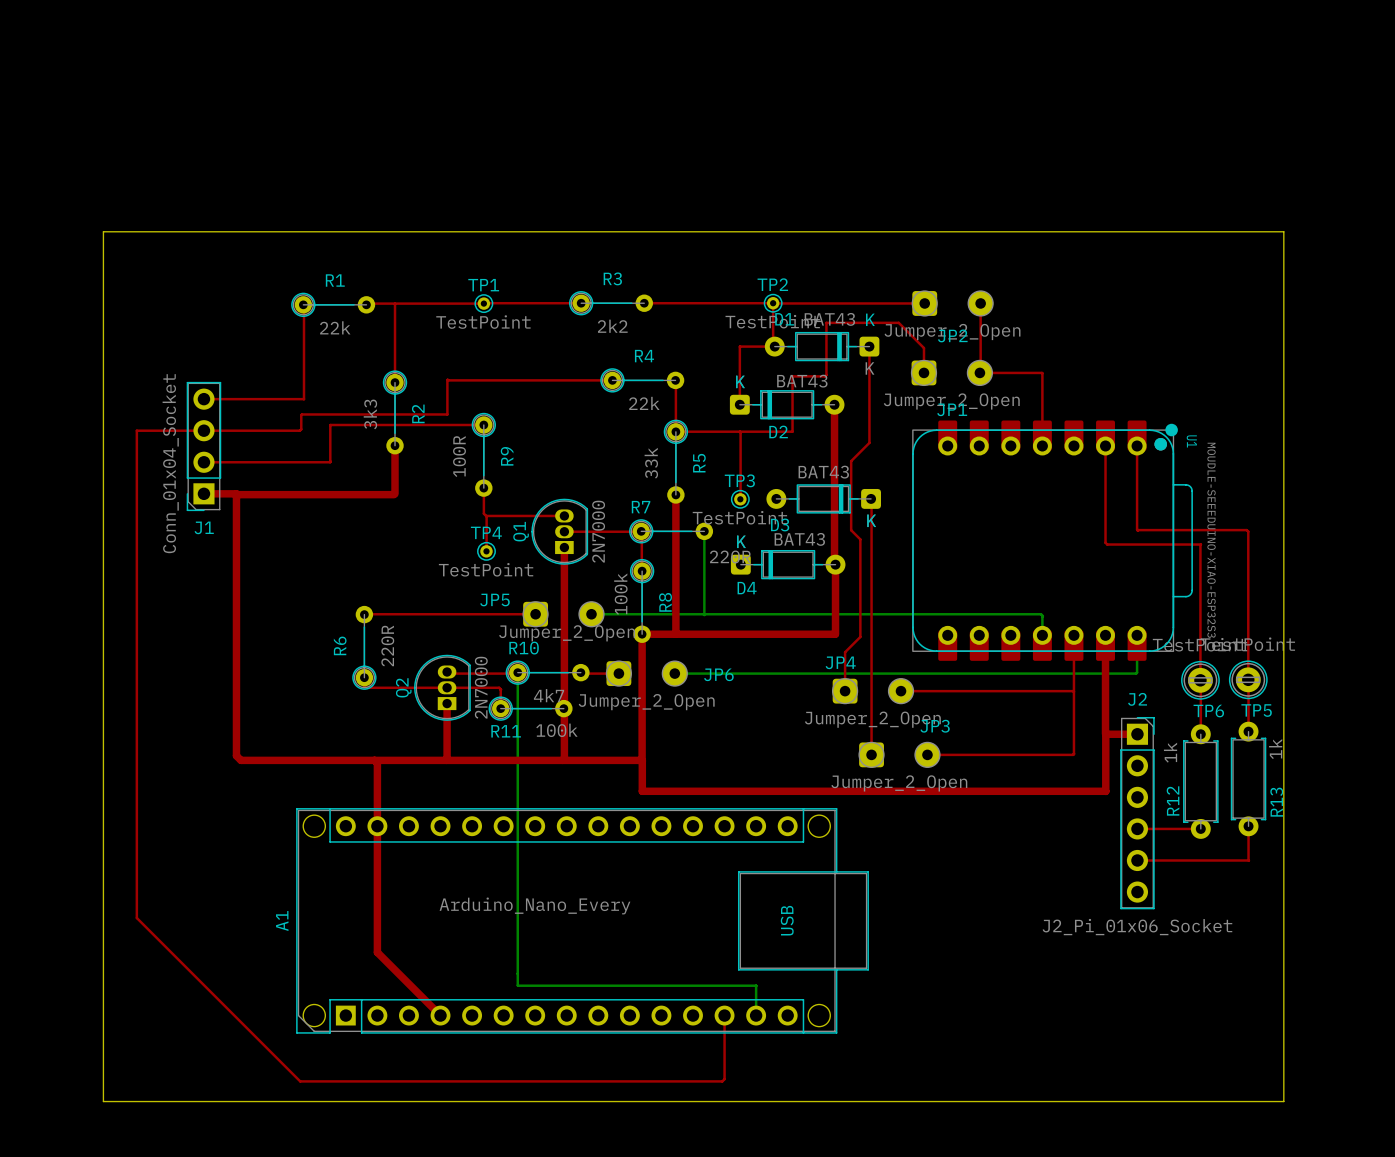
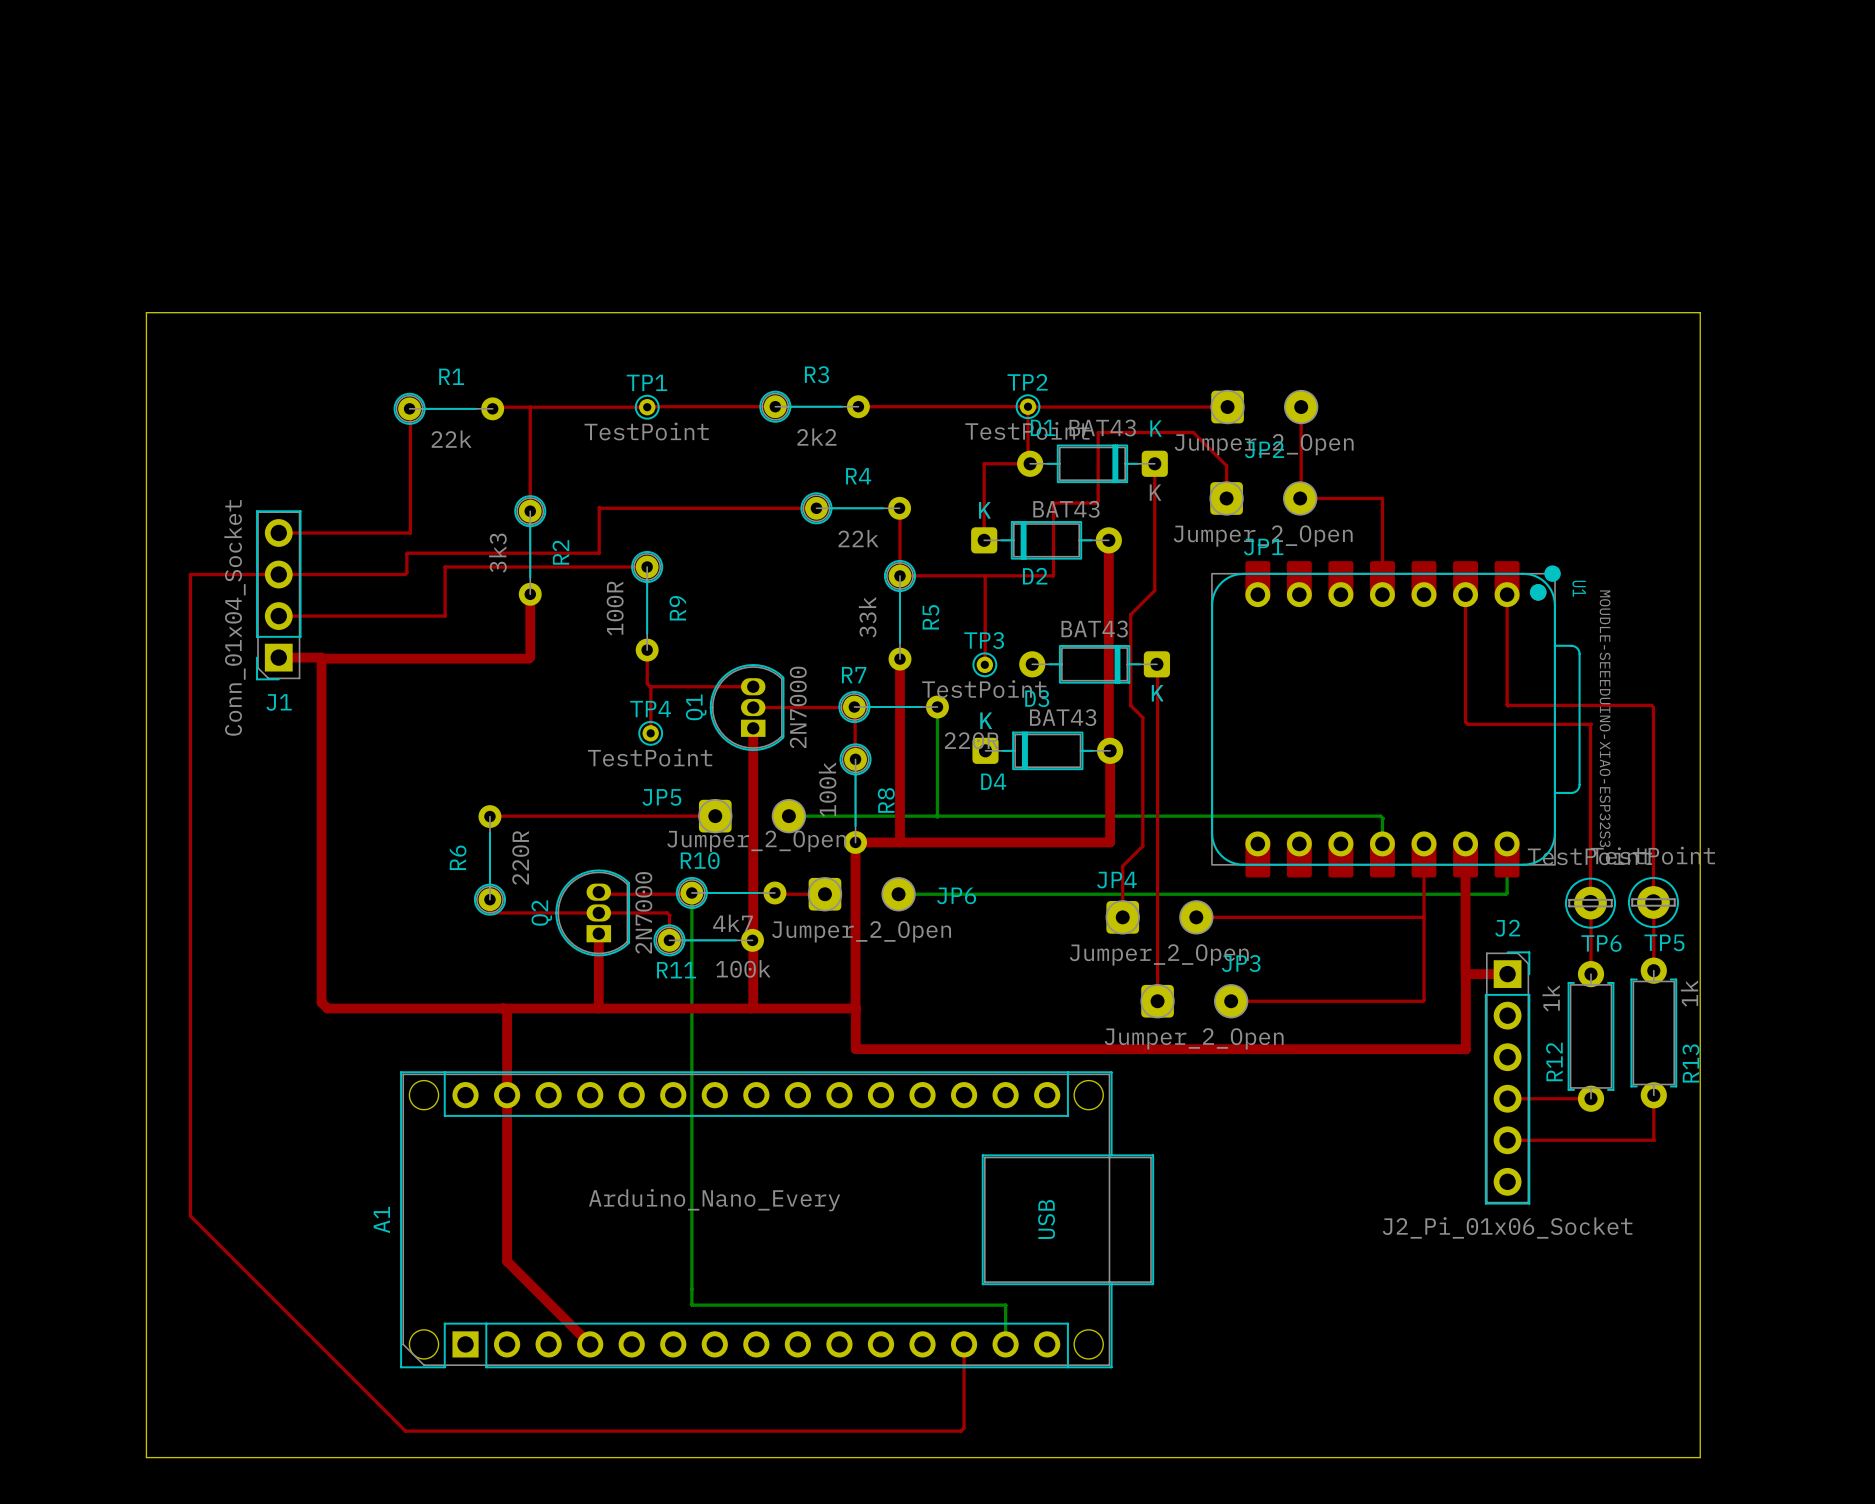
TP6 footprint: [1181, 660, 1220, 700] -> [1564, 877, 1617, 929]
TP5 footprint: [1228, 660, 1268, 700] -> [1627, 876, 1679, 928]

